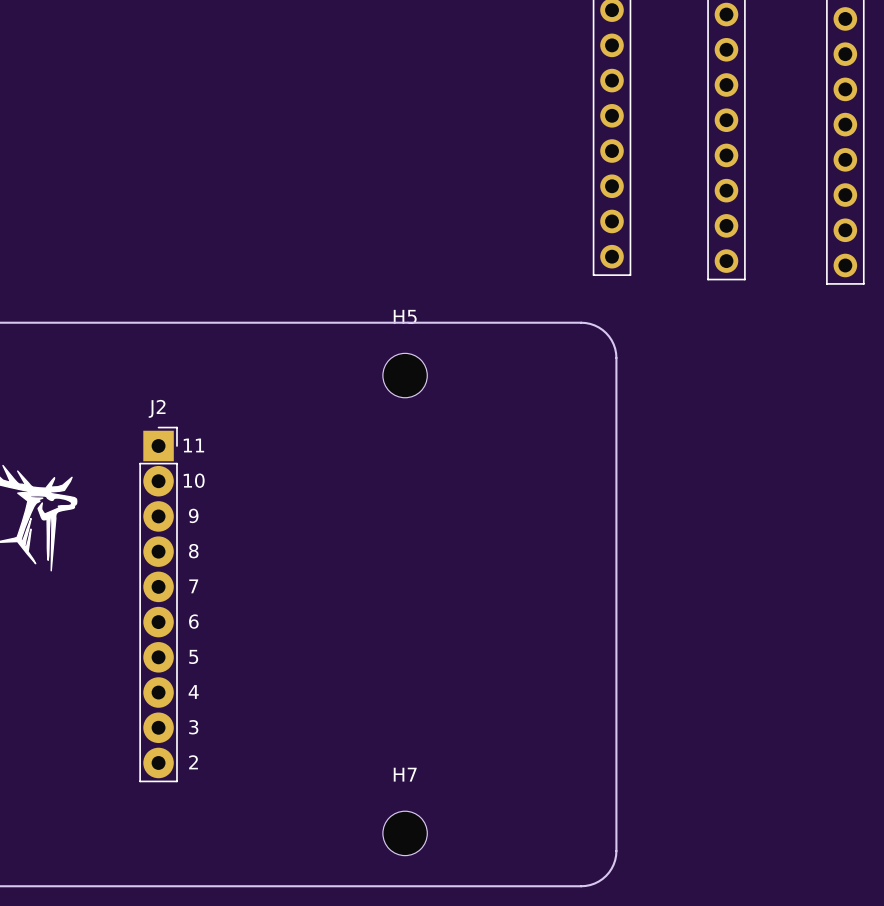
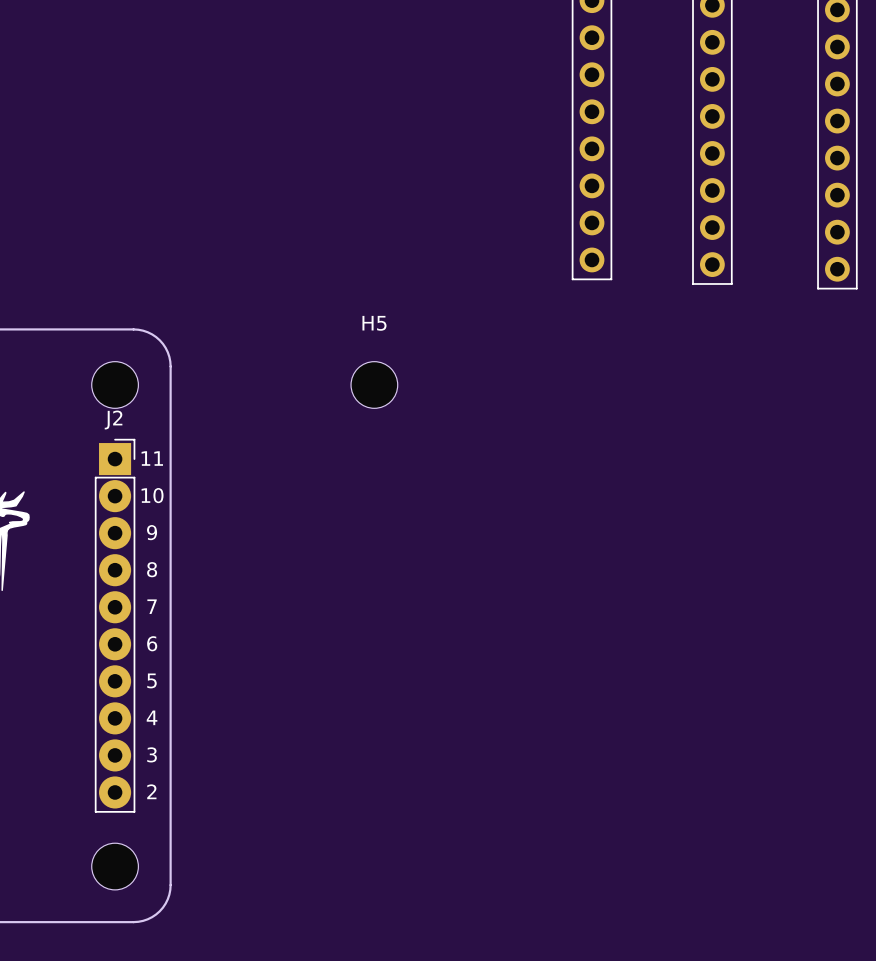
board edge: (176, 322) (585, 323) (598, 327) (609, 336) (615, 348) (616, 357) (616, 851) (615, 860) (609, 872) (594, 883) (581, 886) (176, 886) -> (133, 329) (147, 332) (159, 340) (167, 352) (170, 366) (170, 889) (165, 903) (159, 911) (147, 919) (133, 922)
part: none -> (115, 384)
part: none -> (115, 866)
H7: (405, 833) -> none

